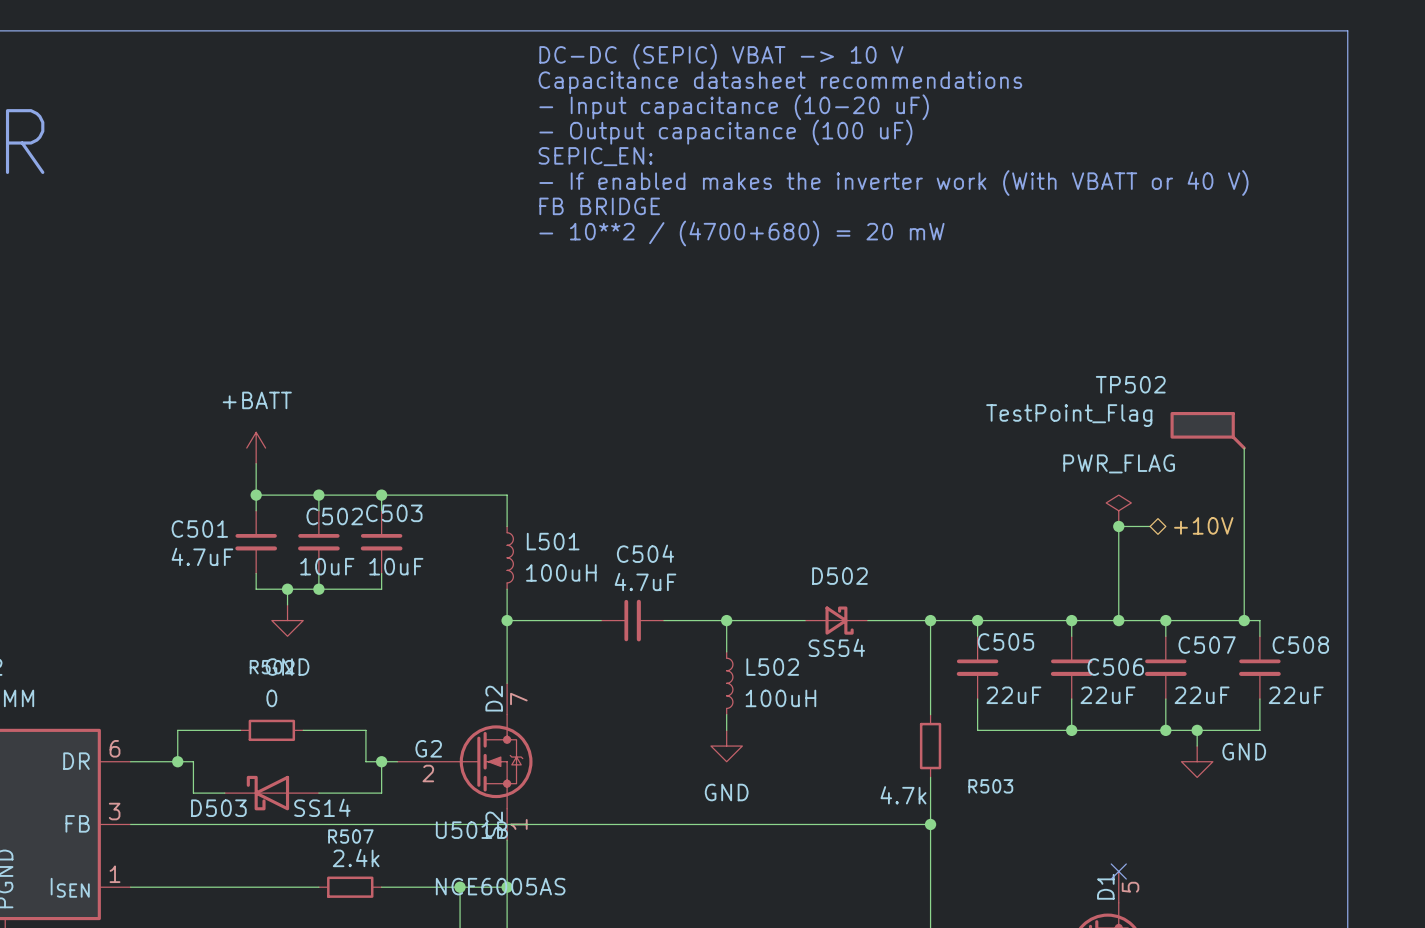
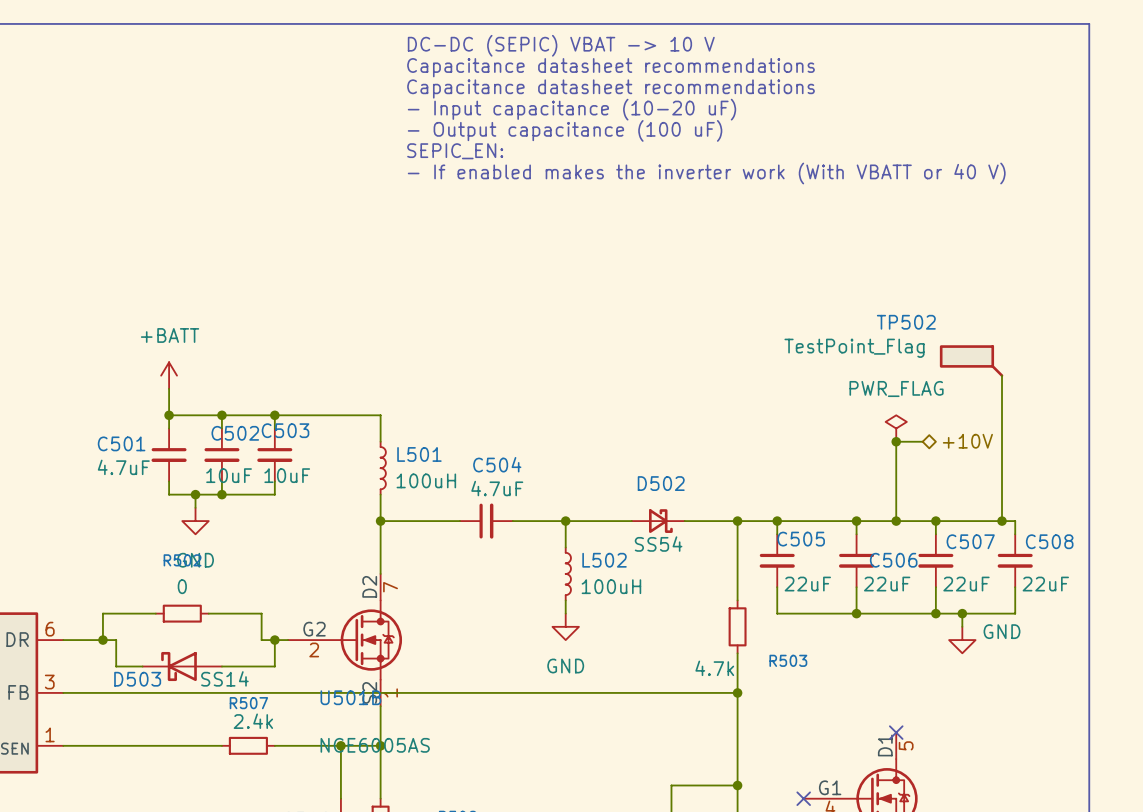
text: - Input capacitance (10-20 uF) (734, 107) -> Capacitance datasheet recommendations (611, 88)
text: - Output capacitance (100 uF) (725, 132) -> - Input capacitance (10-20 uF) (571, 109)
text: SEPIC_EN: (595, 156) -> - Output capacitance (100 uF) (565, 130)
text: - If enabled makes the inverter work (With VBATT or 40 V) (893, 183) -> SEPIC_EN: (455, 151)
text: FB BRIDGE (599, 206) -> - If enabled makes the inverter work (With VBATT or 40 V) (706, 173)
text: - 10**2 / (4700+680) = 20 mW (741, 233) -> none

